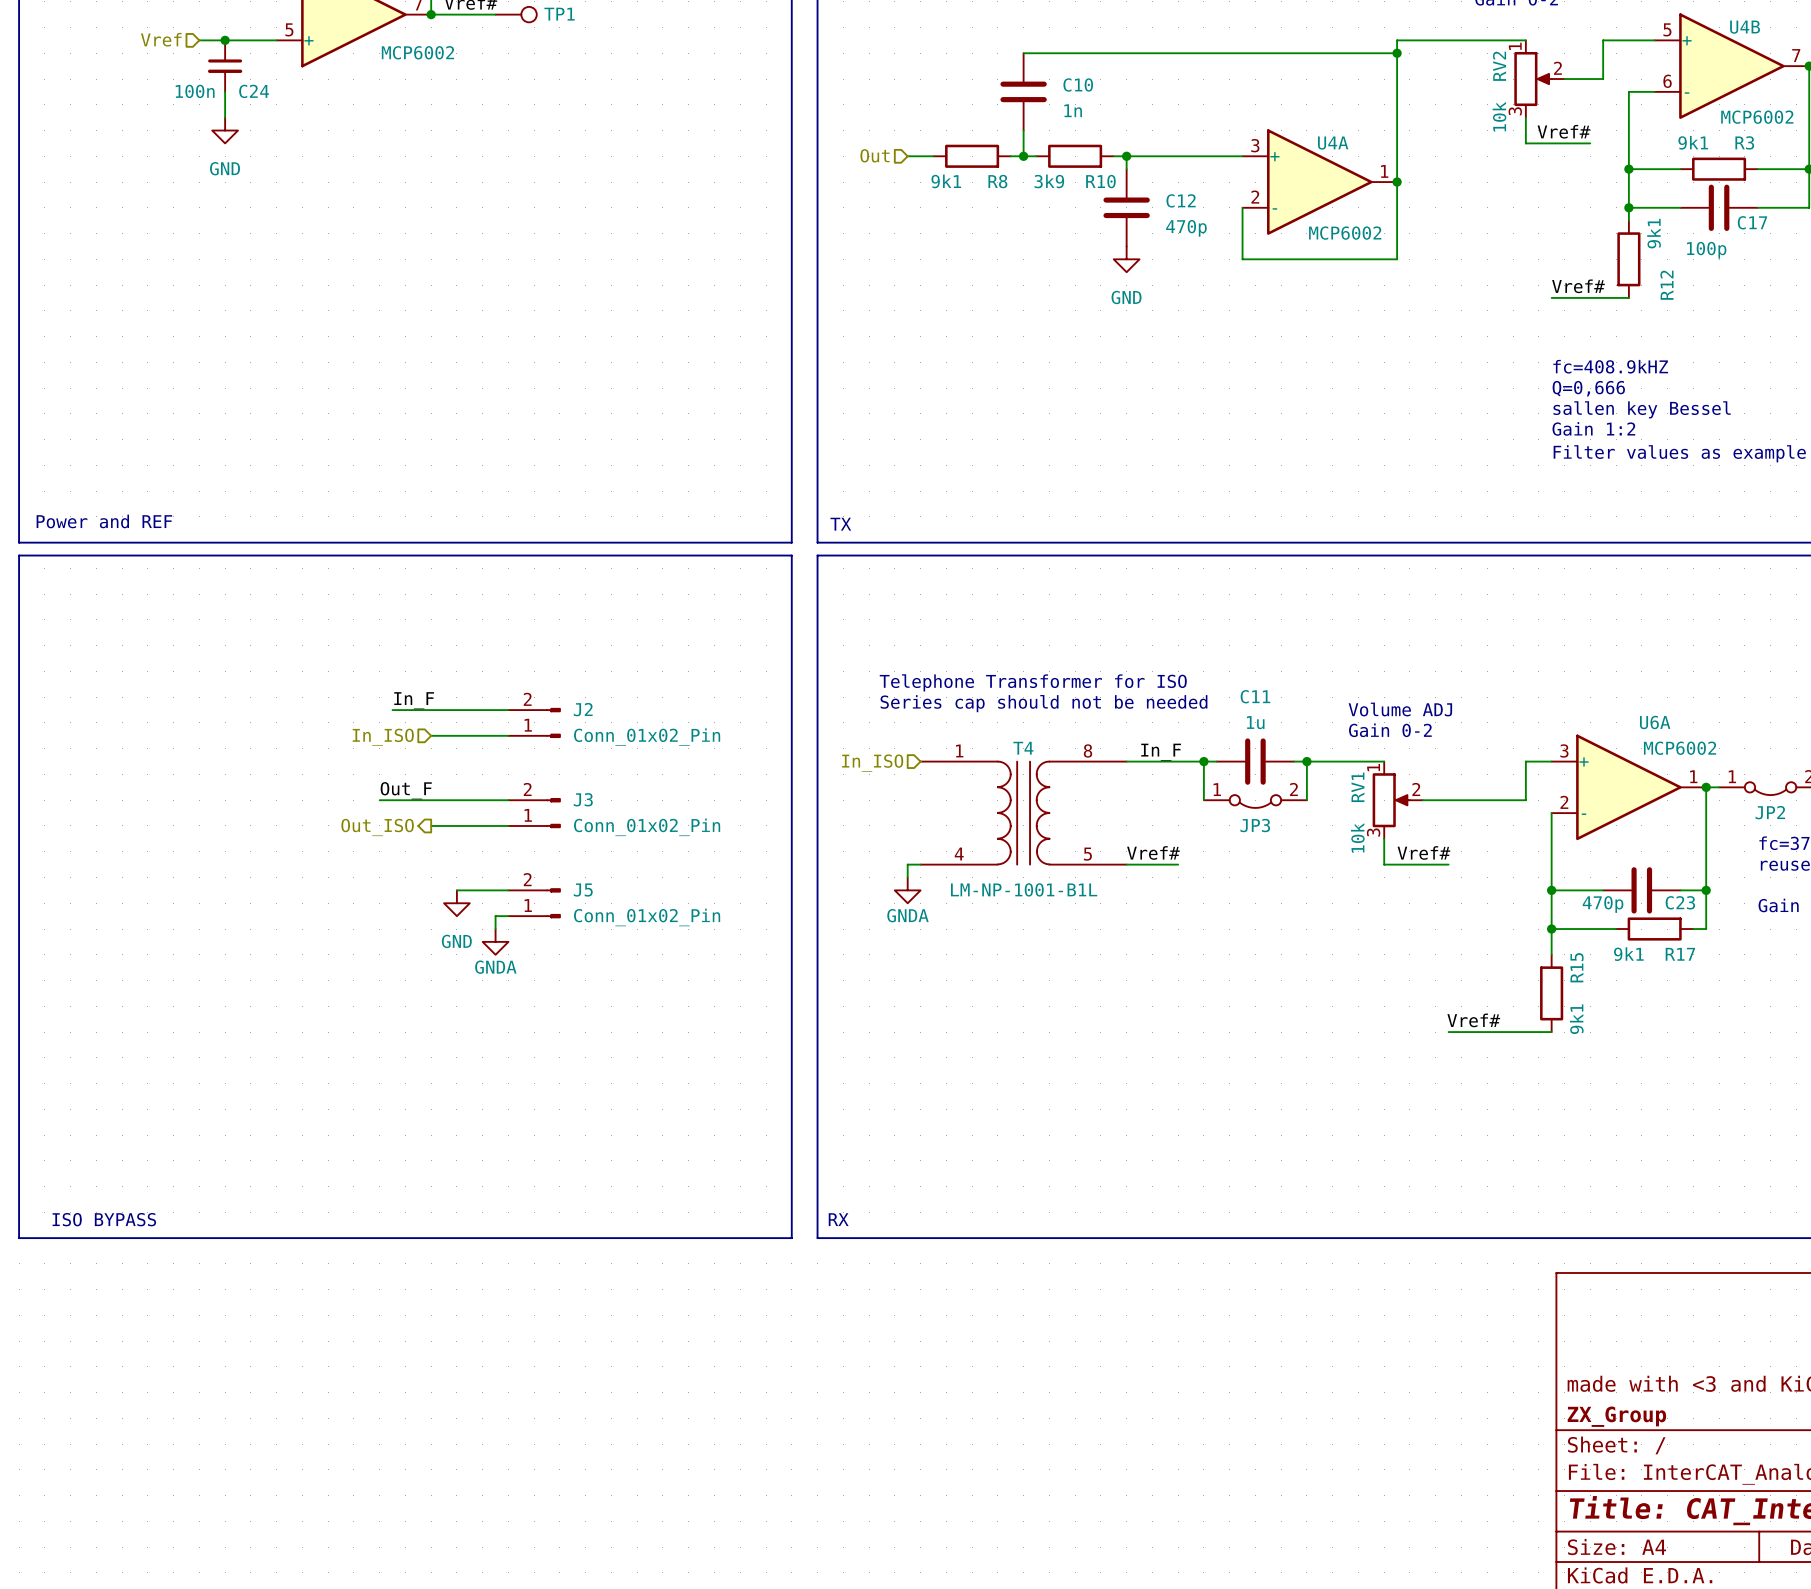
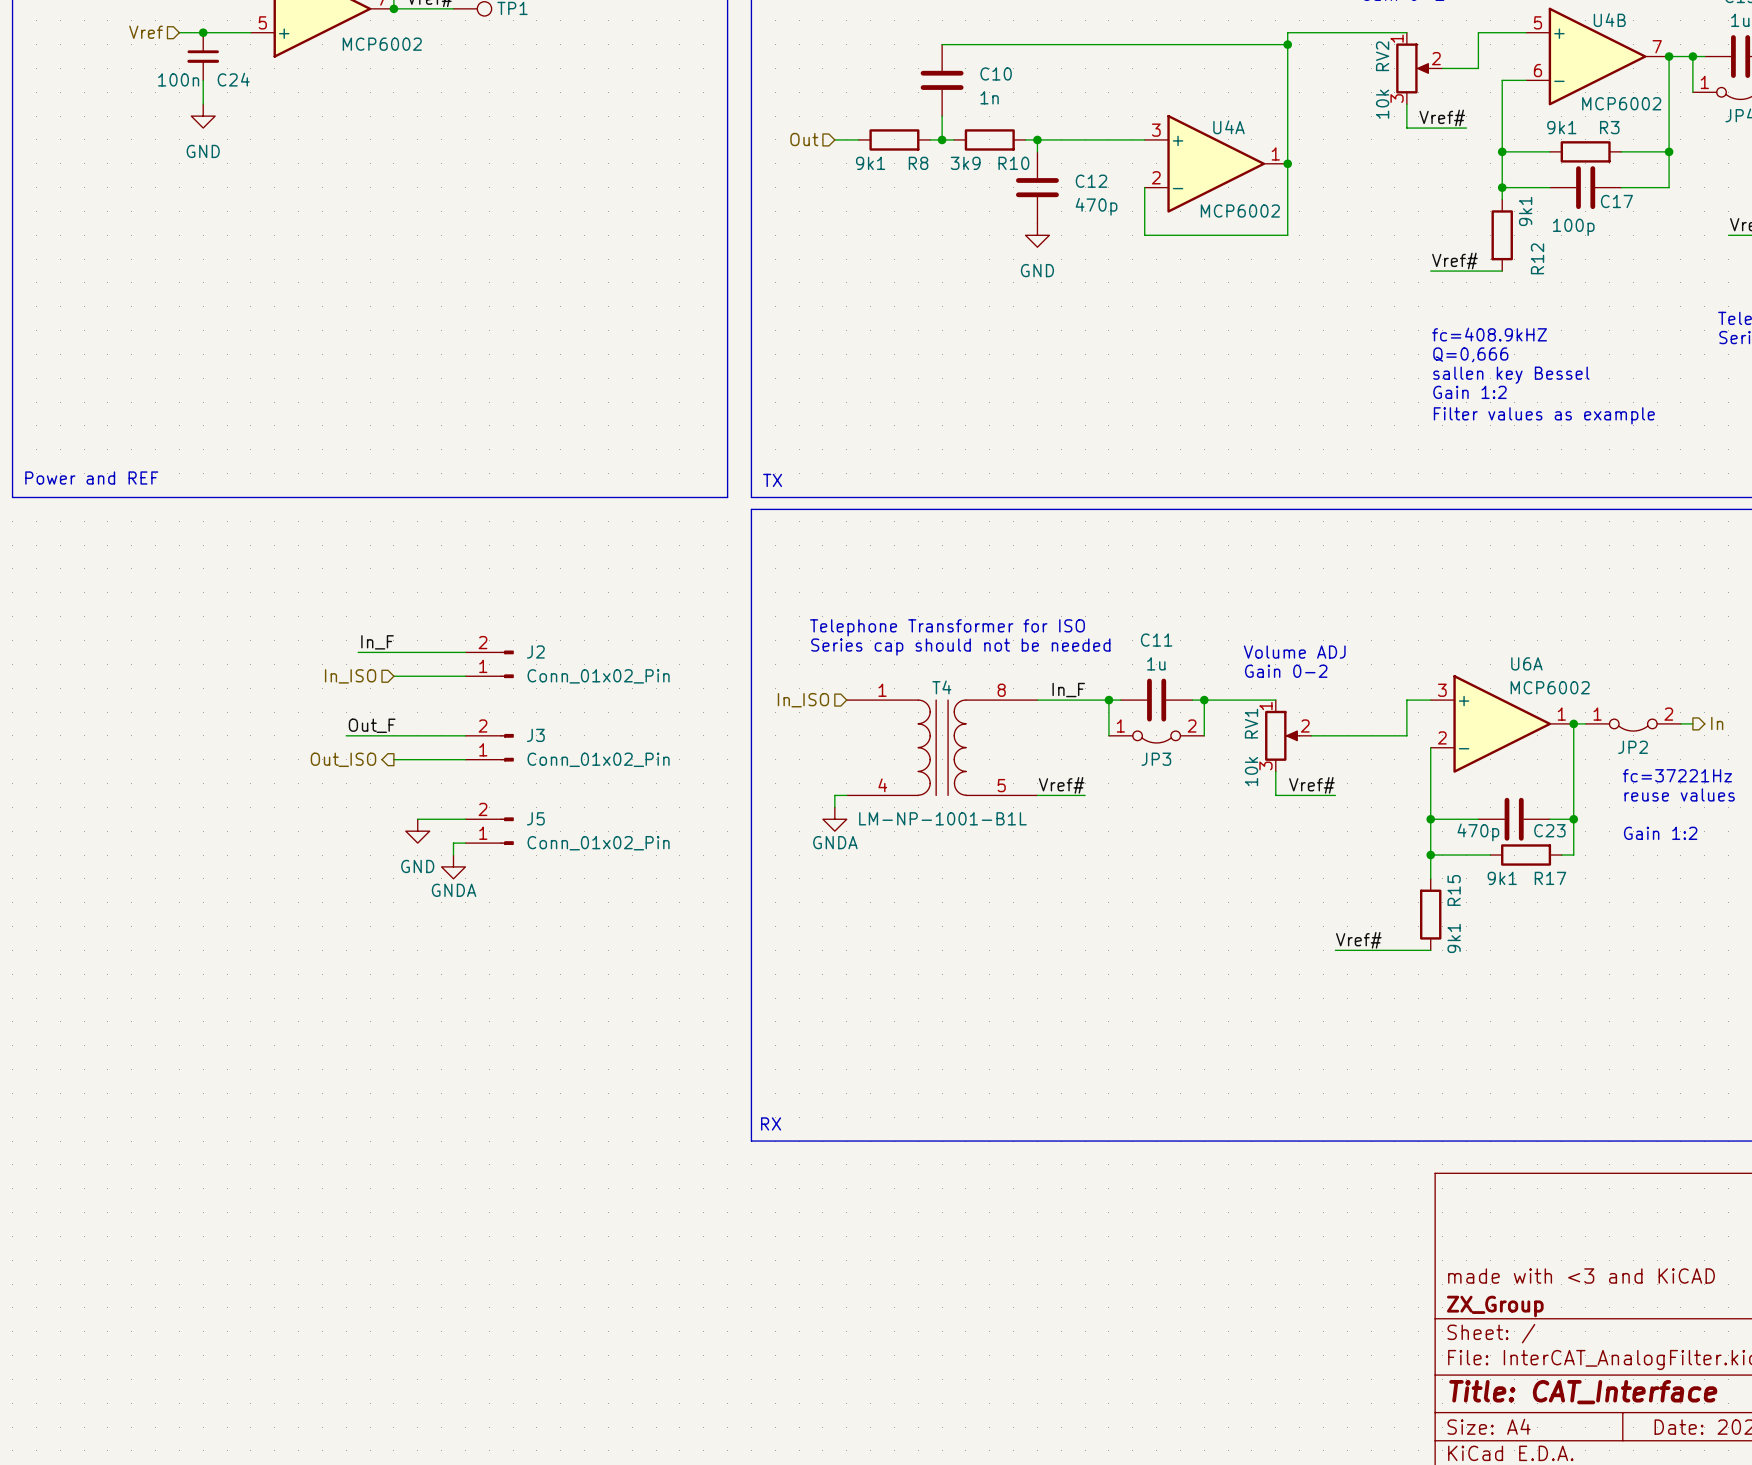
line: (19, 555) (791, 555) (791, 1238) (19, 1238) (19, 555) -> none
text: ISO BYPASS (104, 1219) -> none

